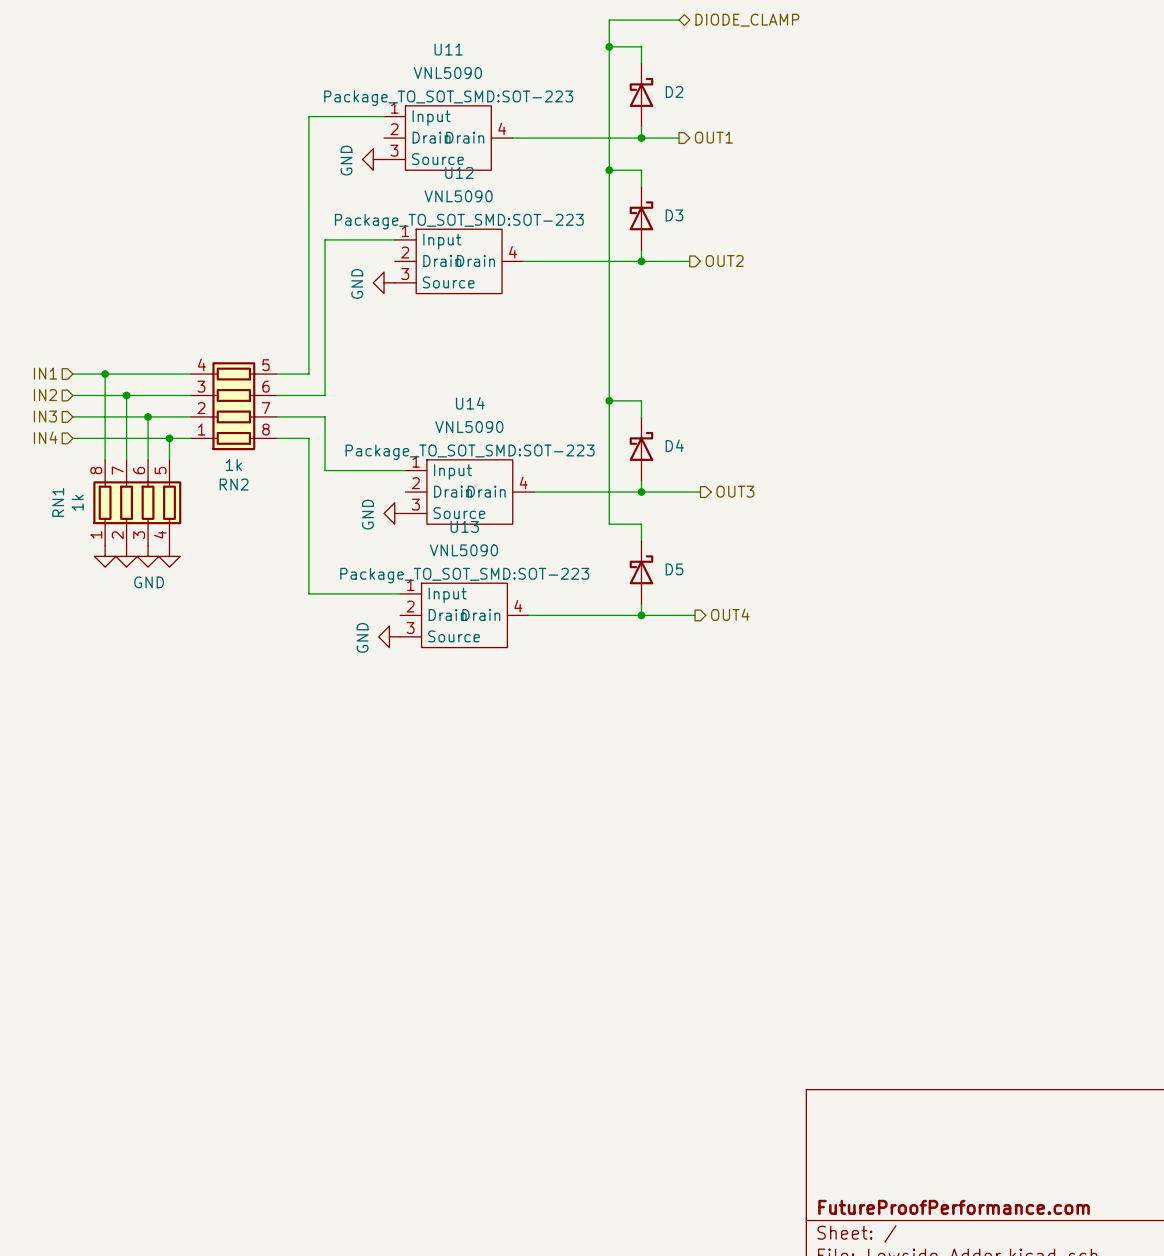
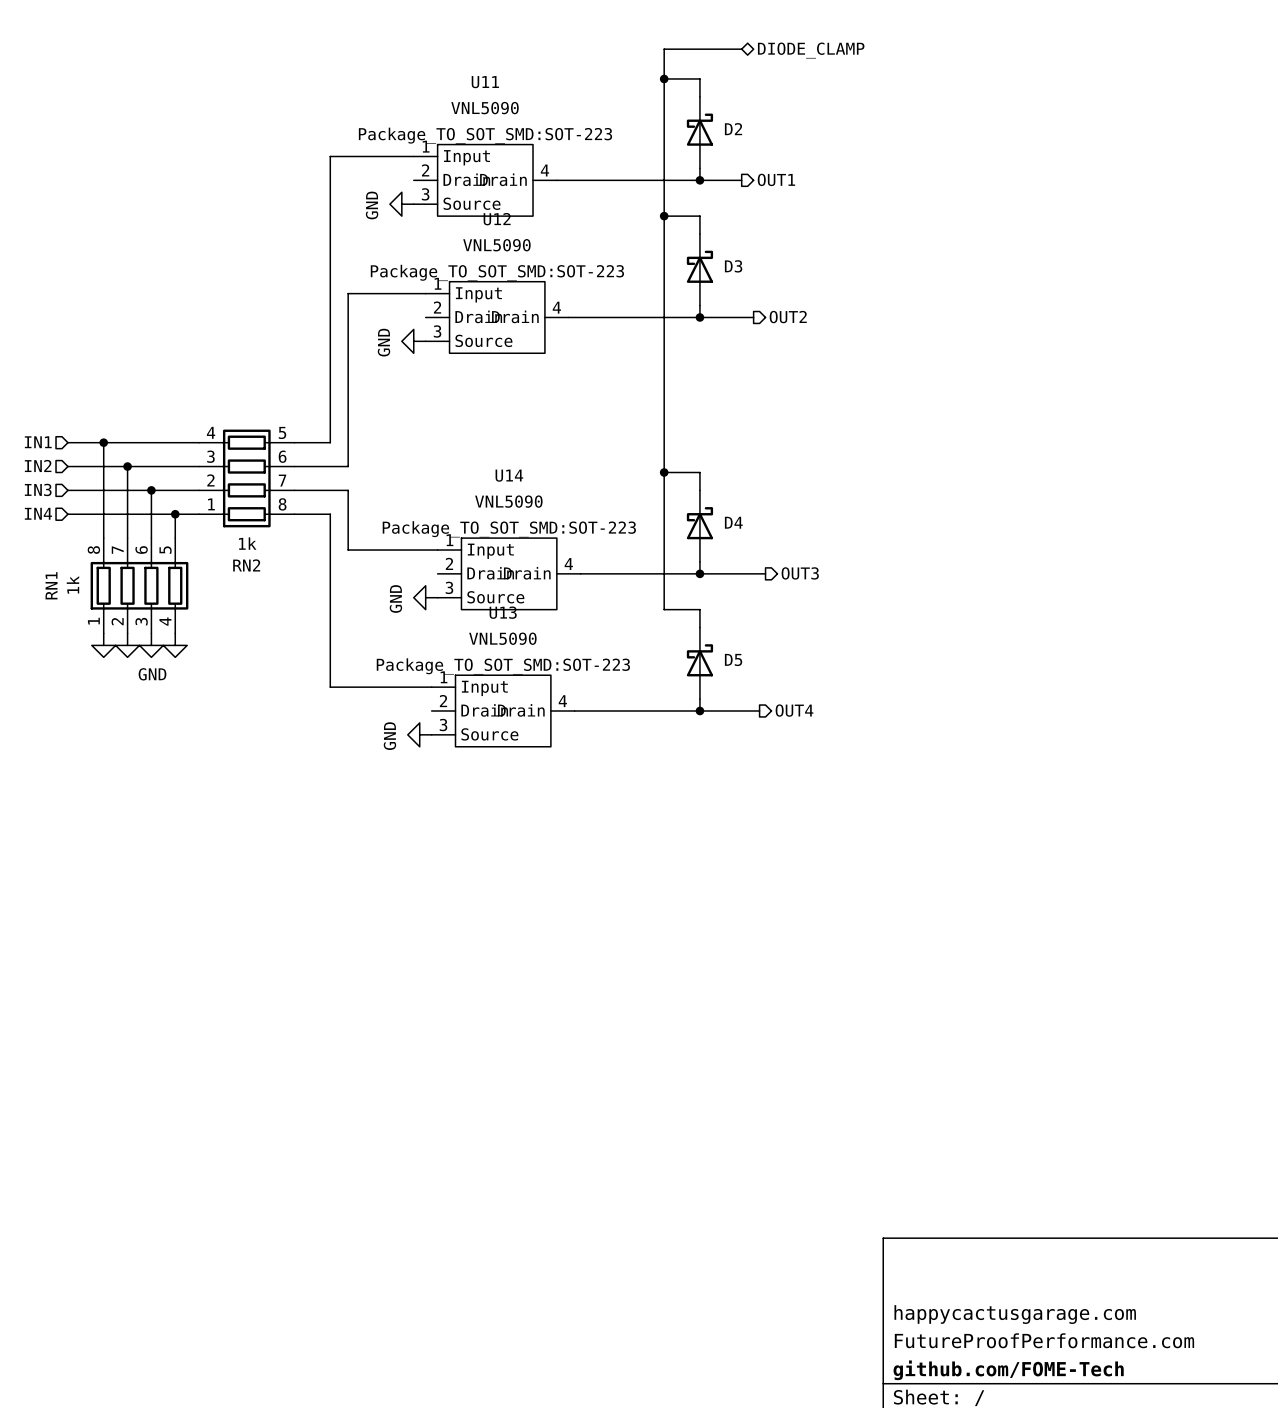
title block: none -> happycactusgarage.com (1015, 1314)
title block: none -> FutureProofPerformance.com (1044, 1340)
title block: FutureProofPerformance.com (954, 1207) -> github.com/FOME-Tech (1008, 1370)

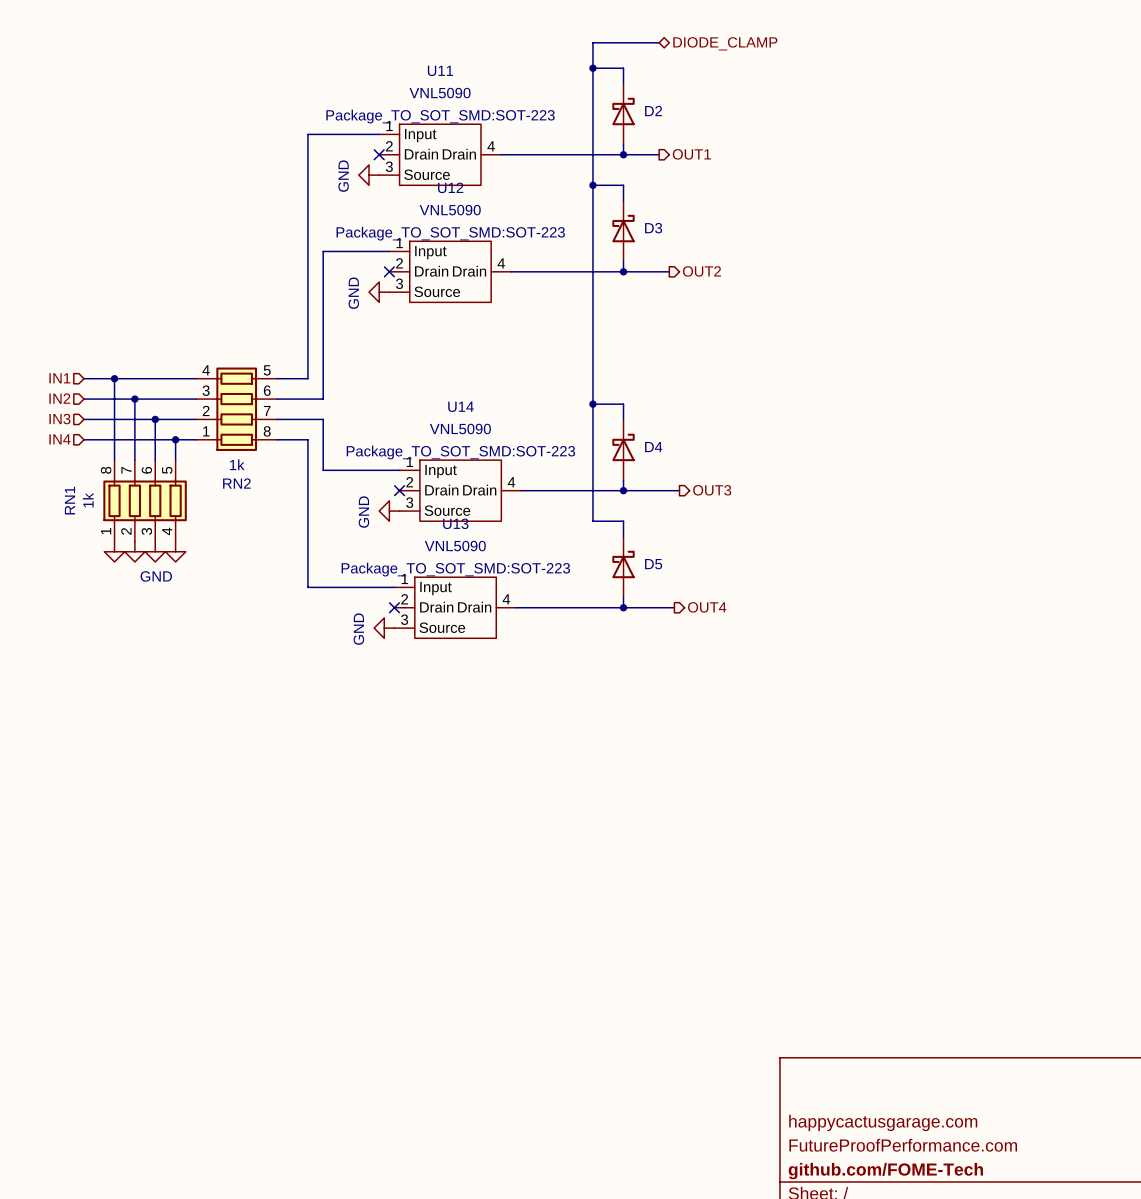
no-connect mark: none -> (379, 154)
no-connect mark: none -> (389, 271)
no-connect mark: none -> (399, 490)
no-connect mark: none -> (394, 607)

